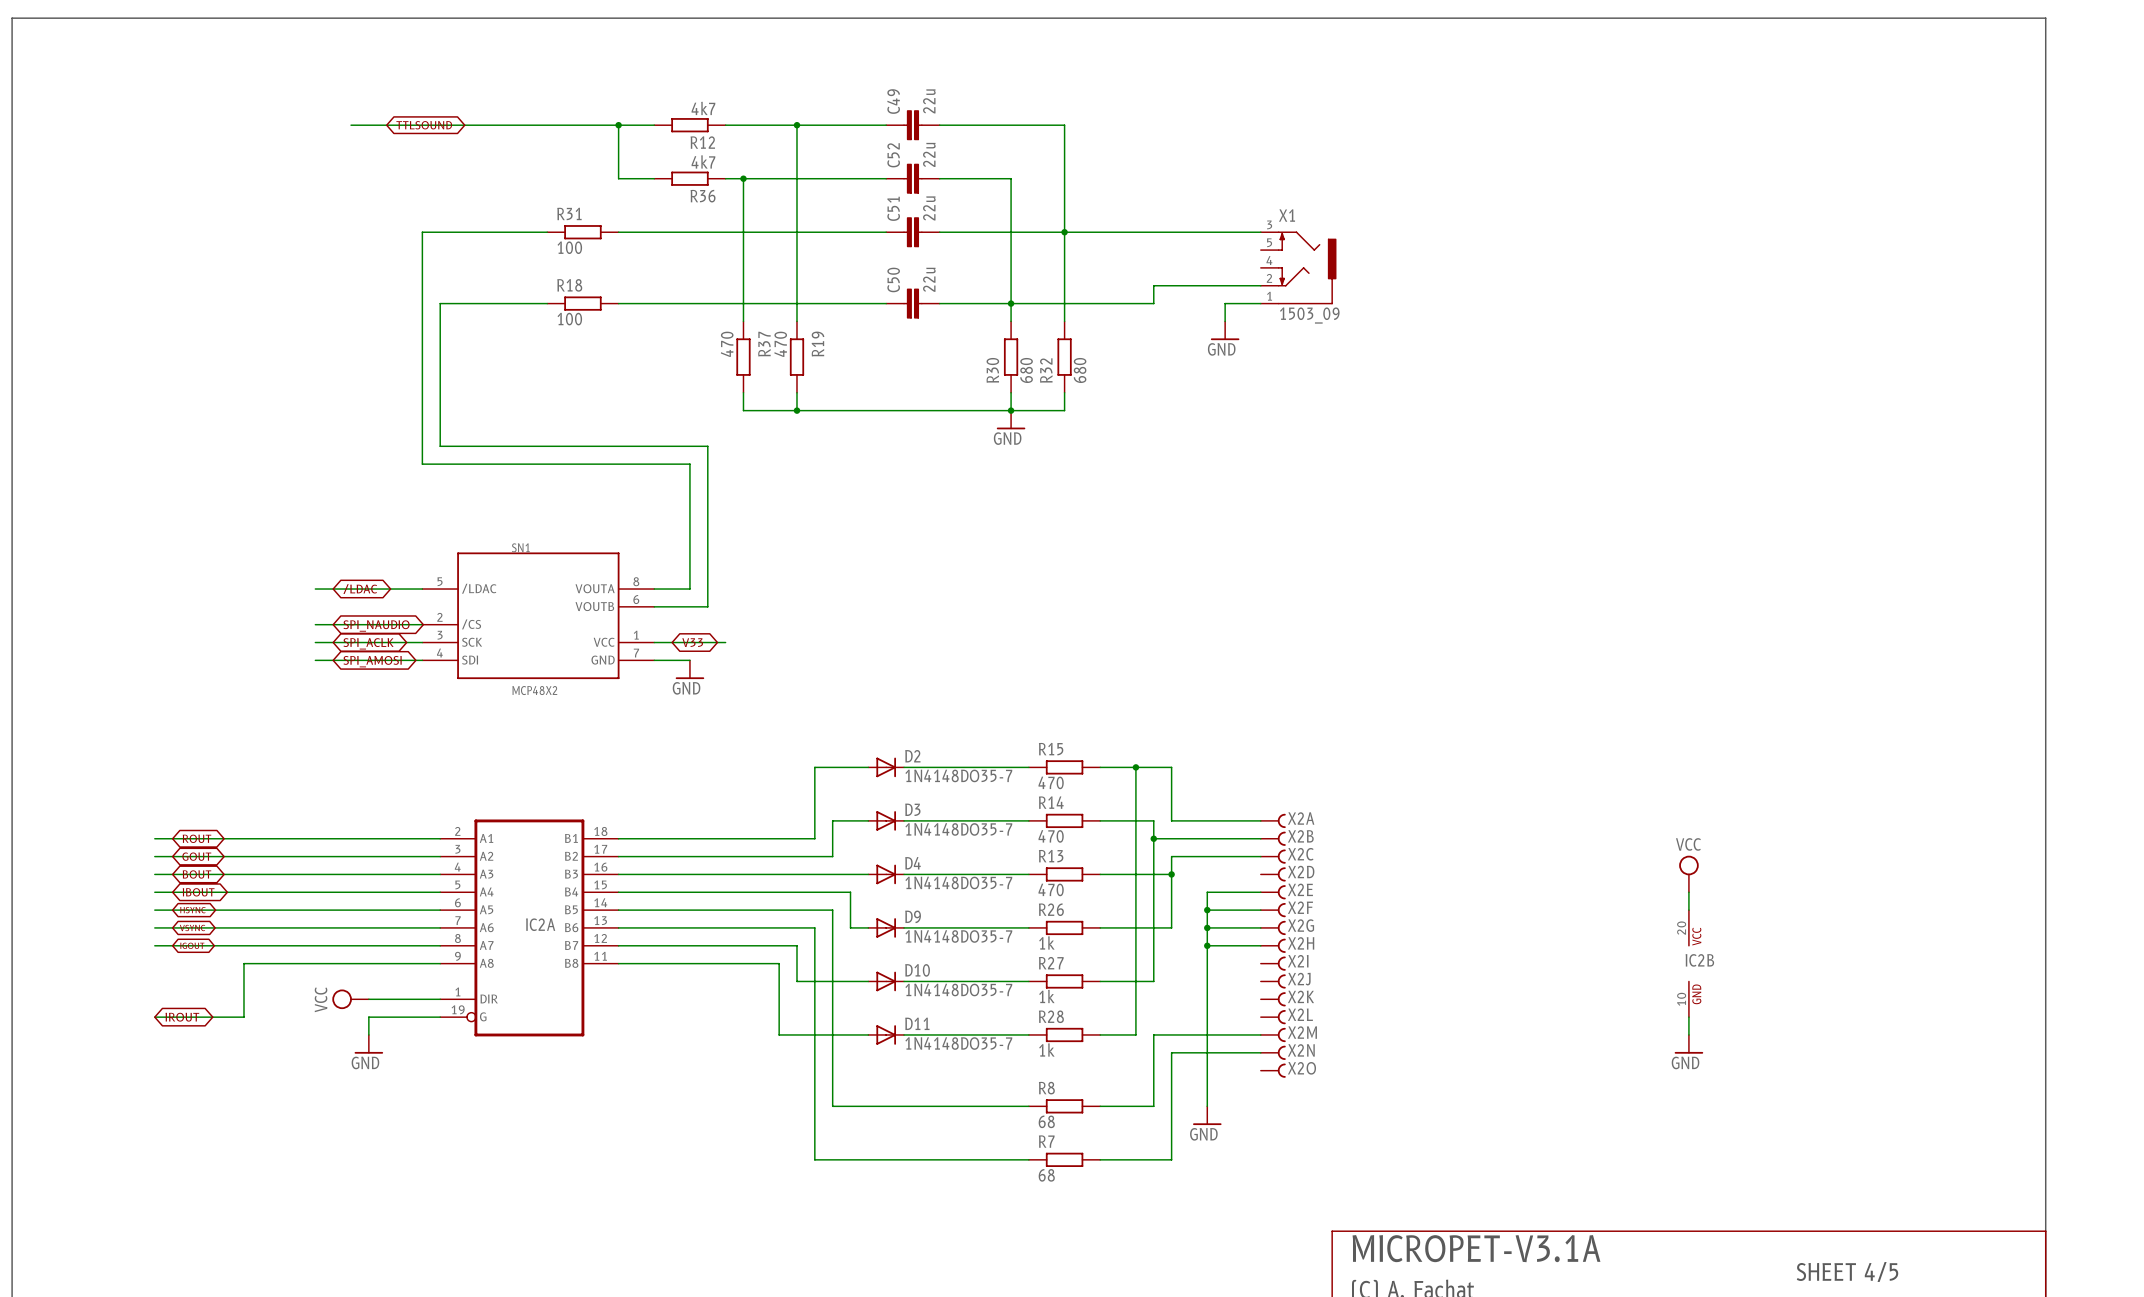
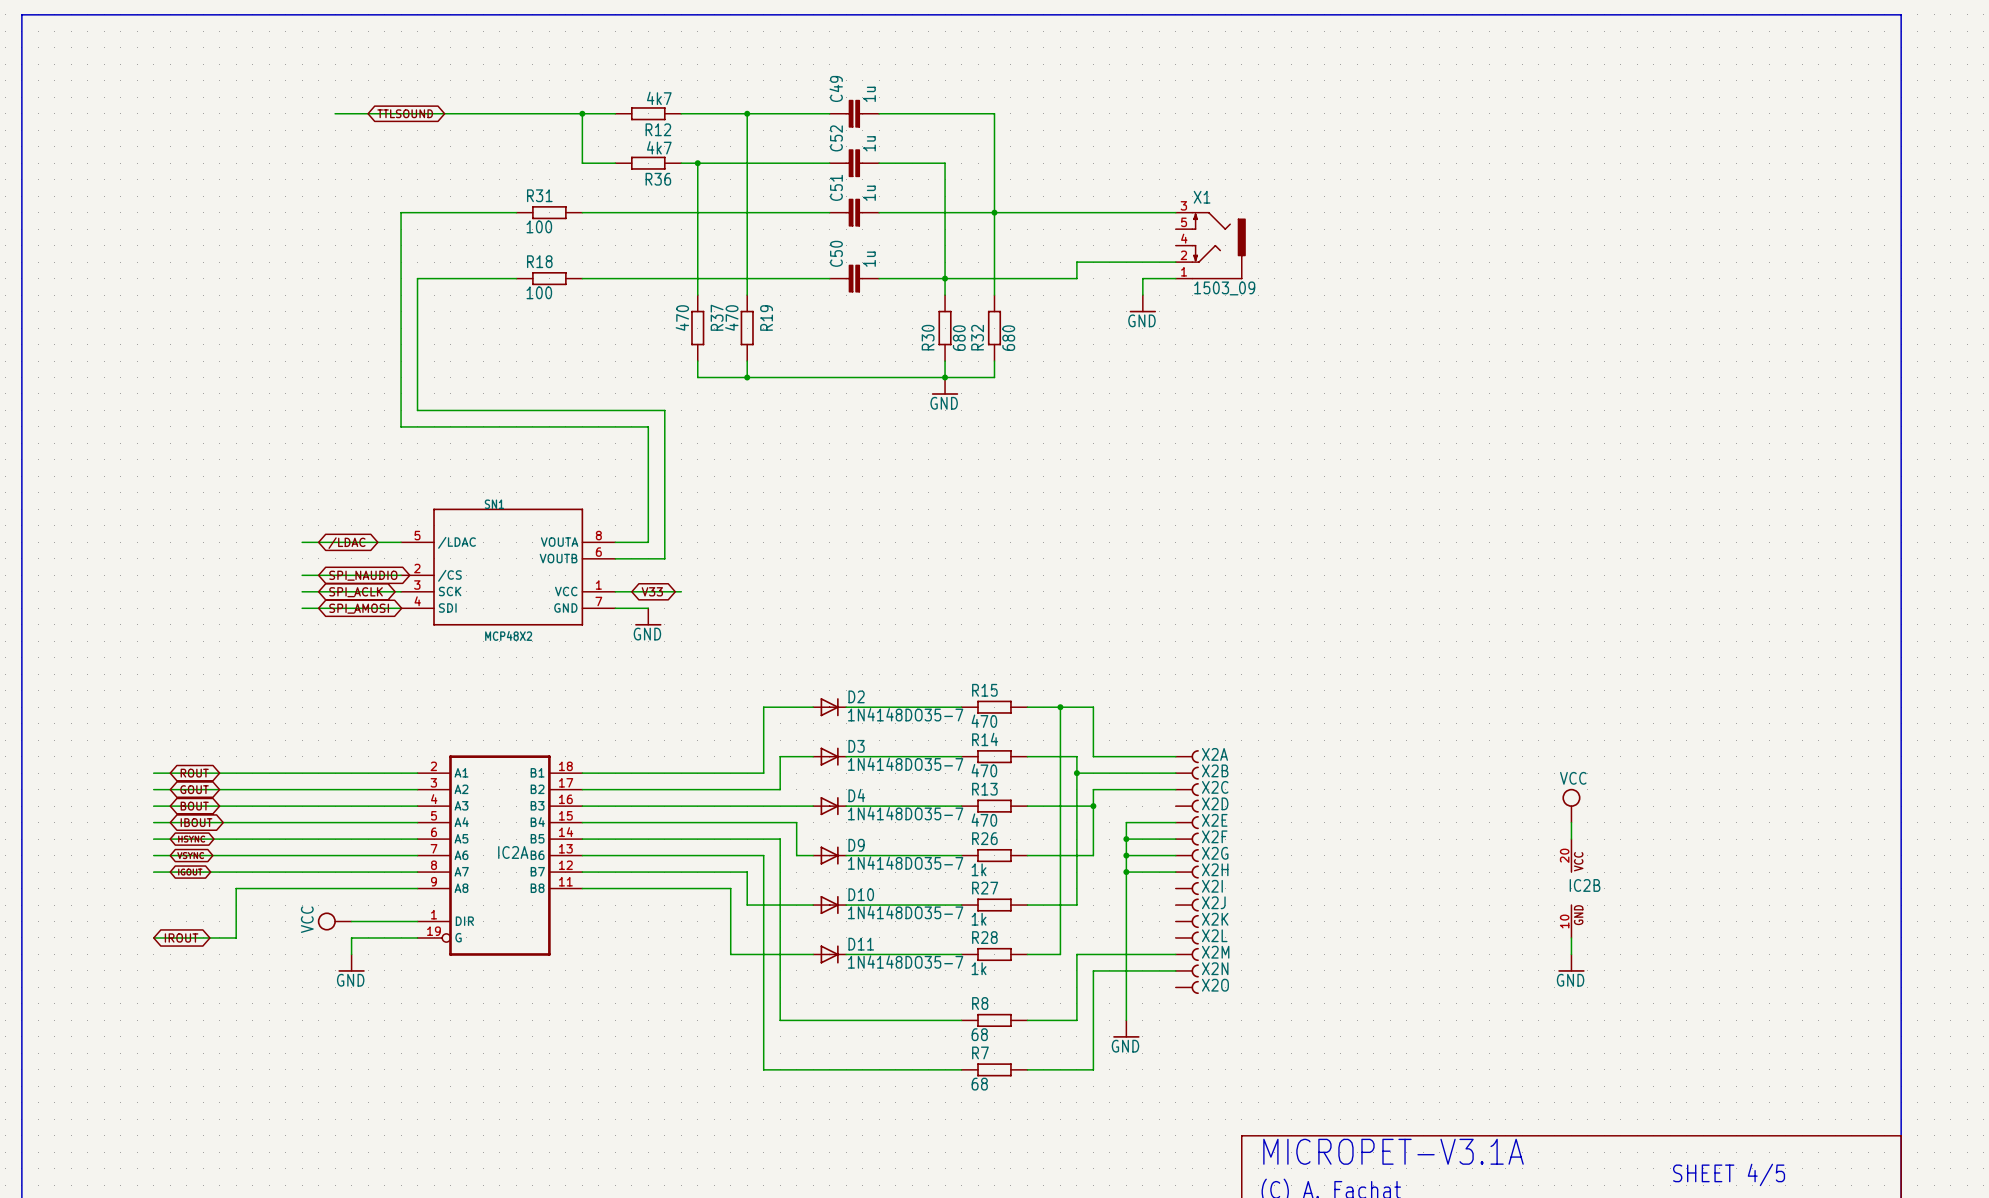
C49 value: 22u (929, 101) -> 1u (869, 94)
C52 value: 22u (929, 154) -> 1u (869, 143)
C51 value: 22u (929, 208) -> 1u (869, 193)
C50 value: 22u (929, 279) -> 1u (869, 259)

